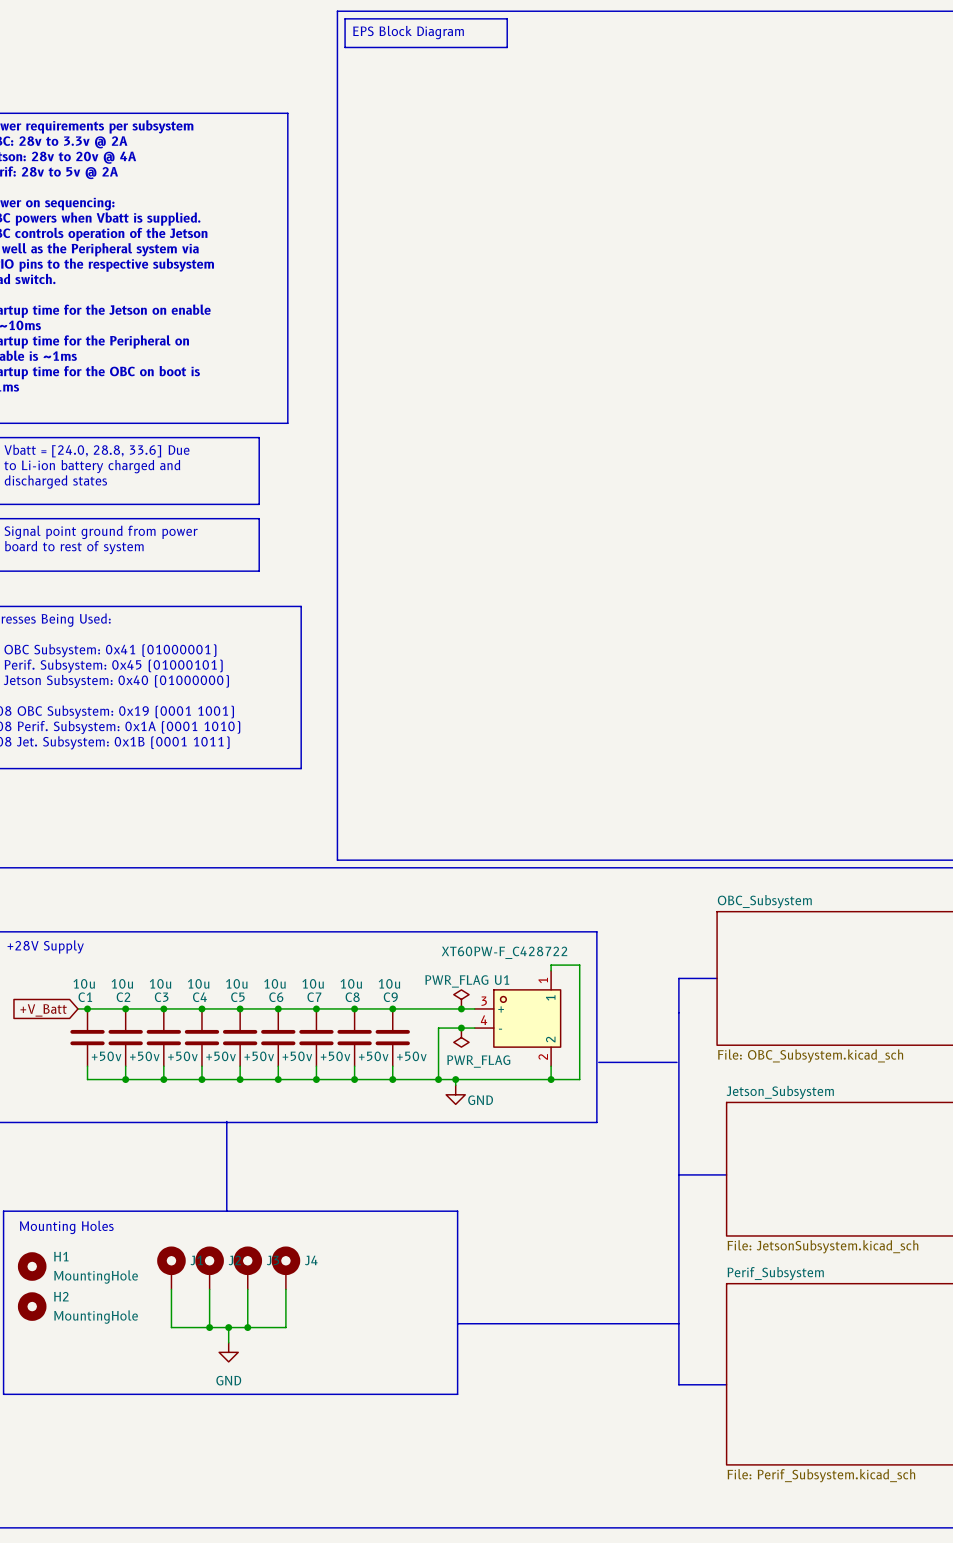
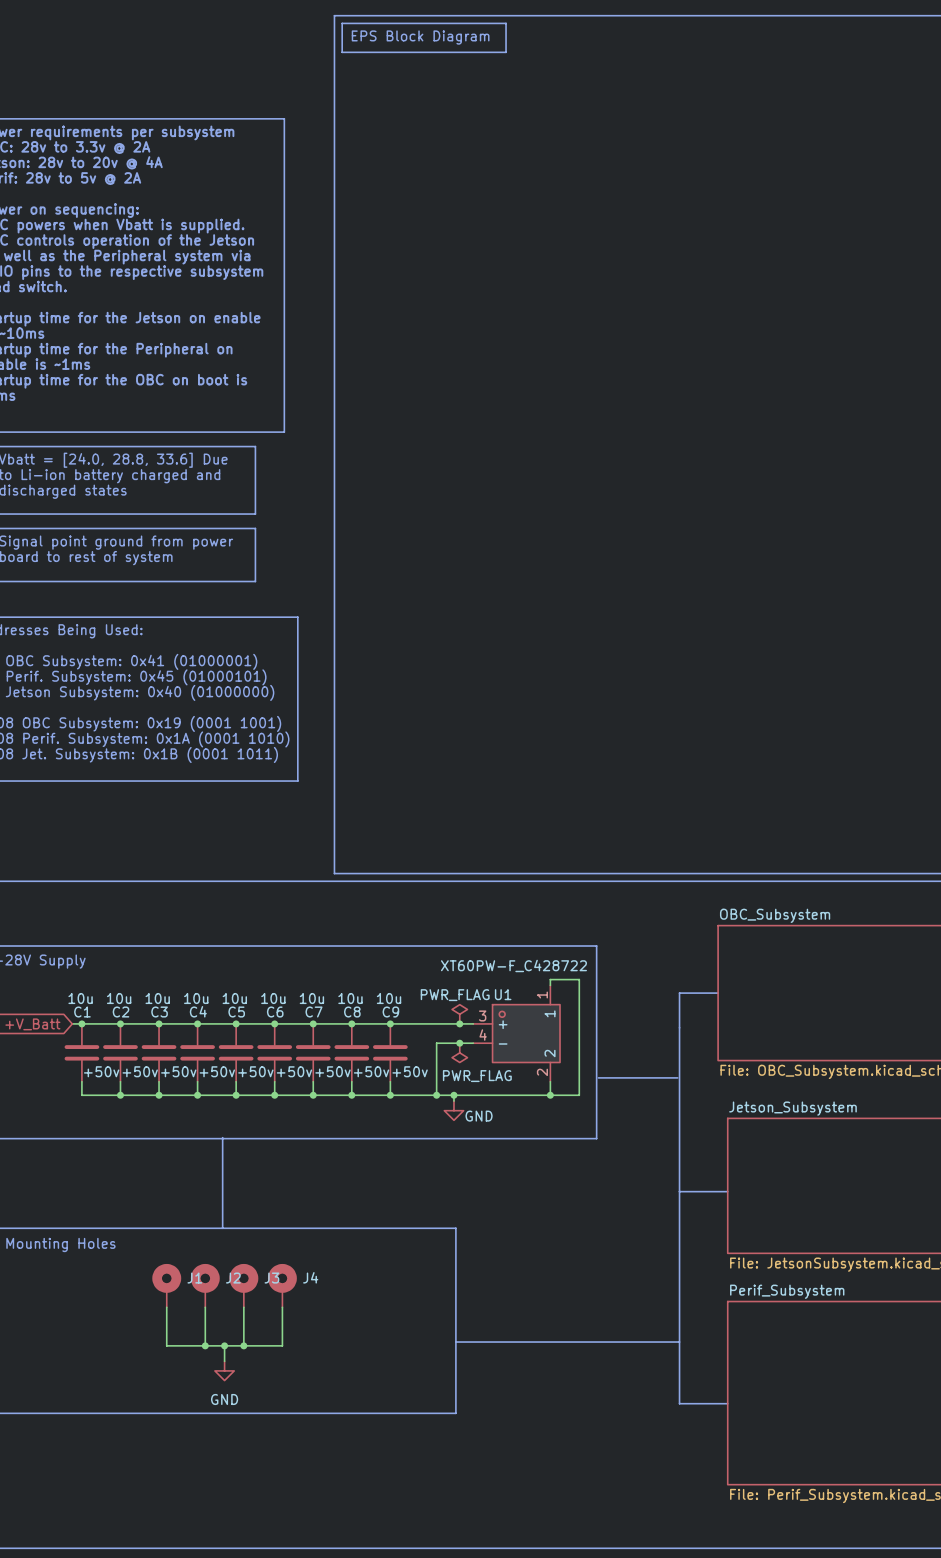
H1: MountingHole (32, 1266) -> none
H2: MountingHole (32, 1306) -> none

